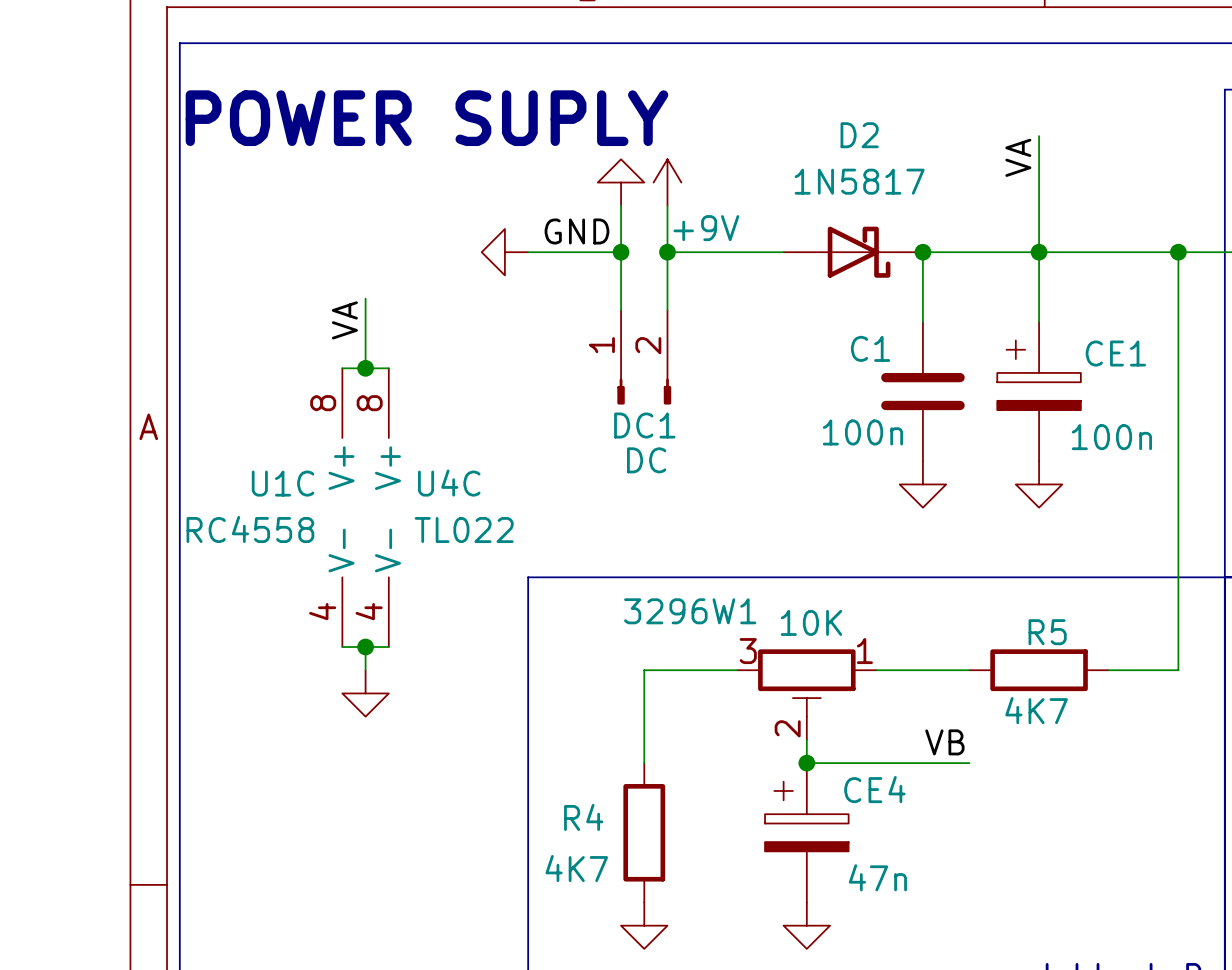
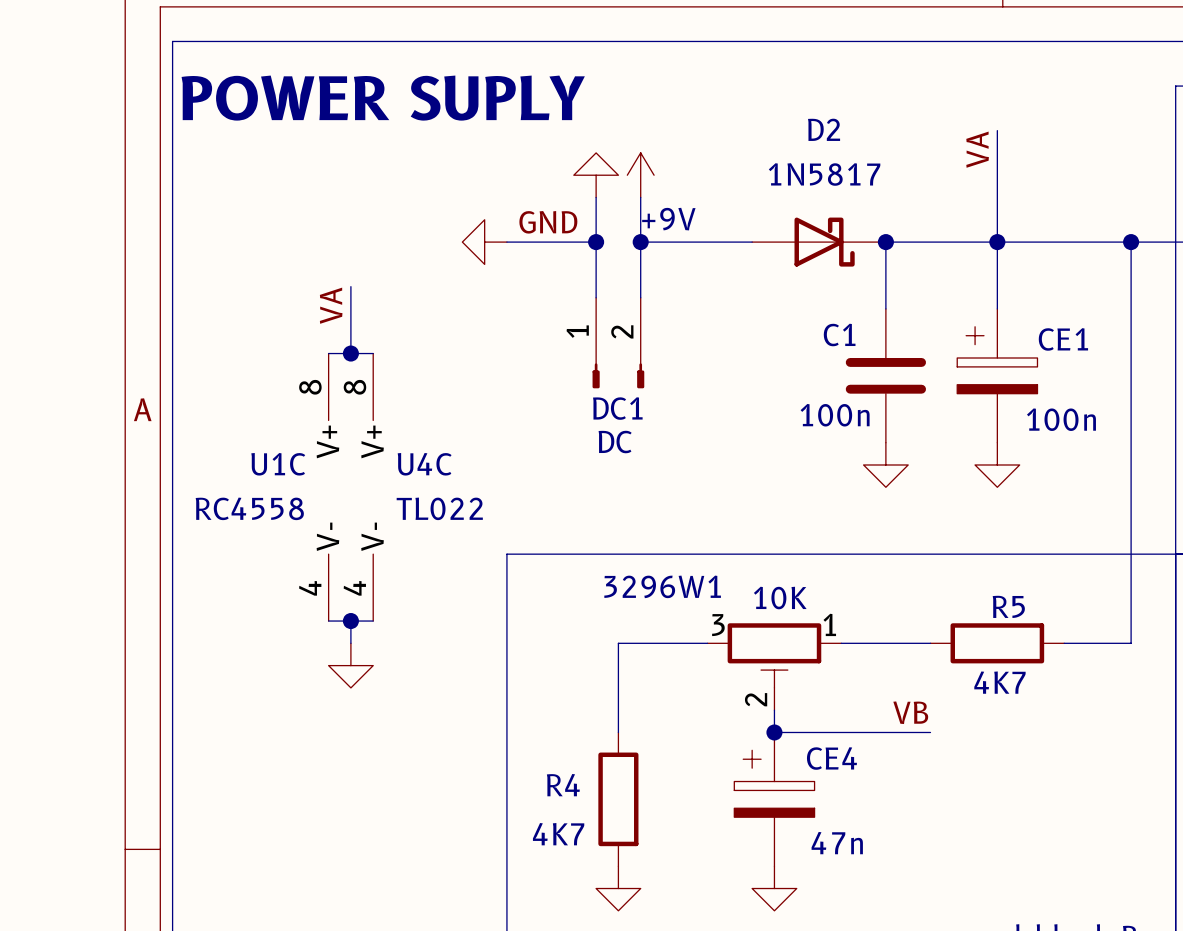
text position: POWER SUPLY (426, 118) -> POWER SUPLY (383, 98)

